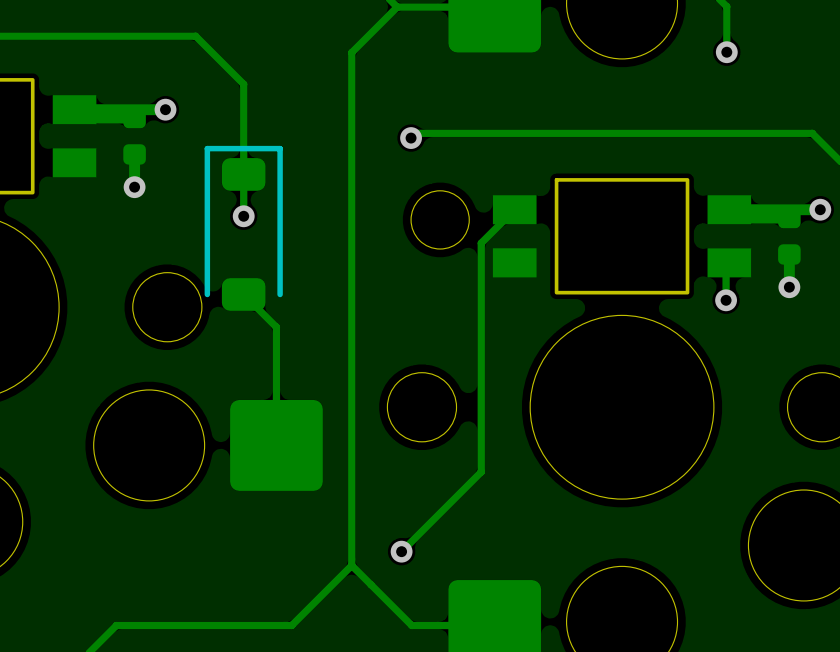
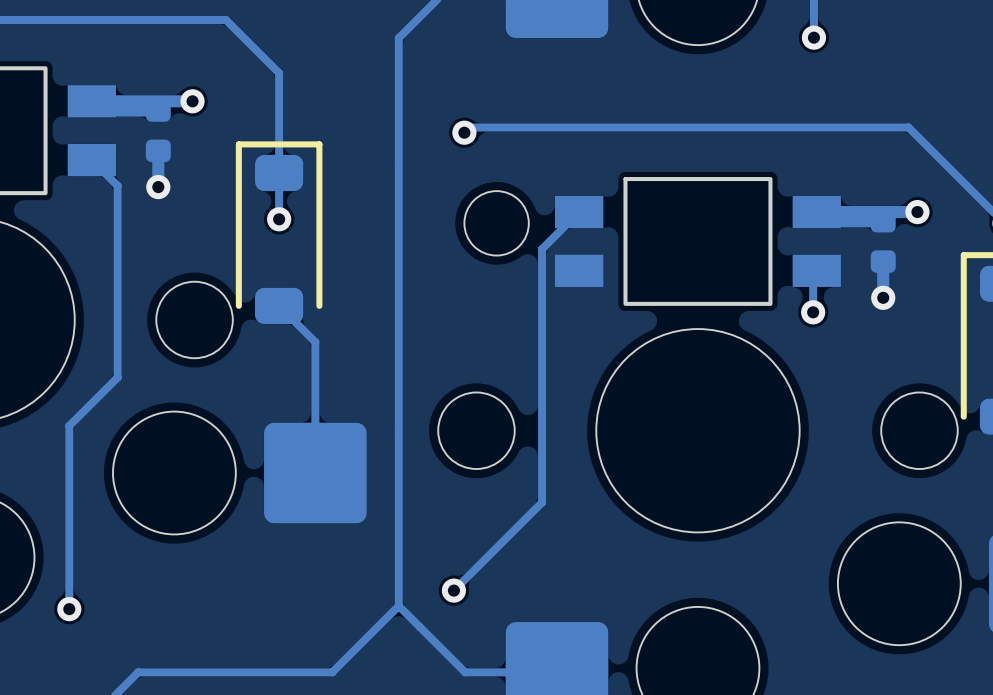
track: none -> (91, 160) (117, 185) (117, 377) (69, 425) (69, 609)
via: none -> (69, 609)

